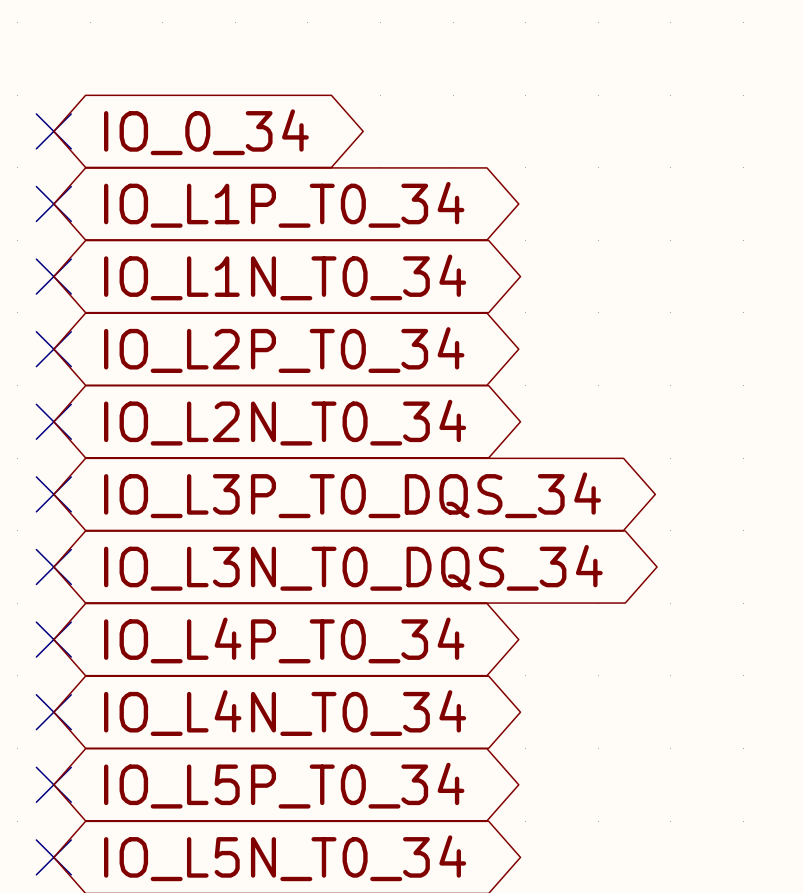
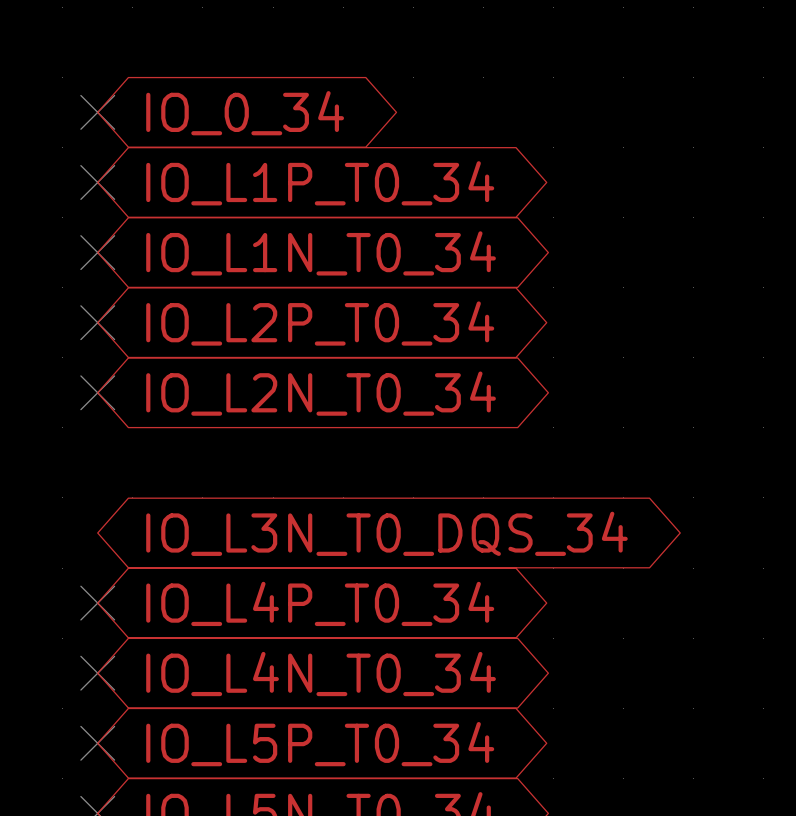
no-connect mark: (53, 494) -> none
global label: IO_L3P_T0_DQS_34 (352, 495) -> none
no-connect mark: (53, 566) -> none

